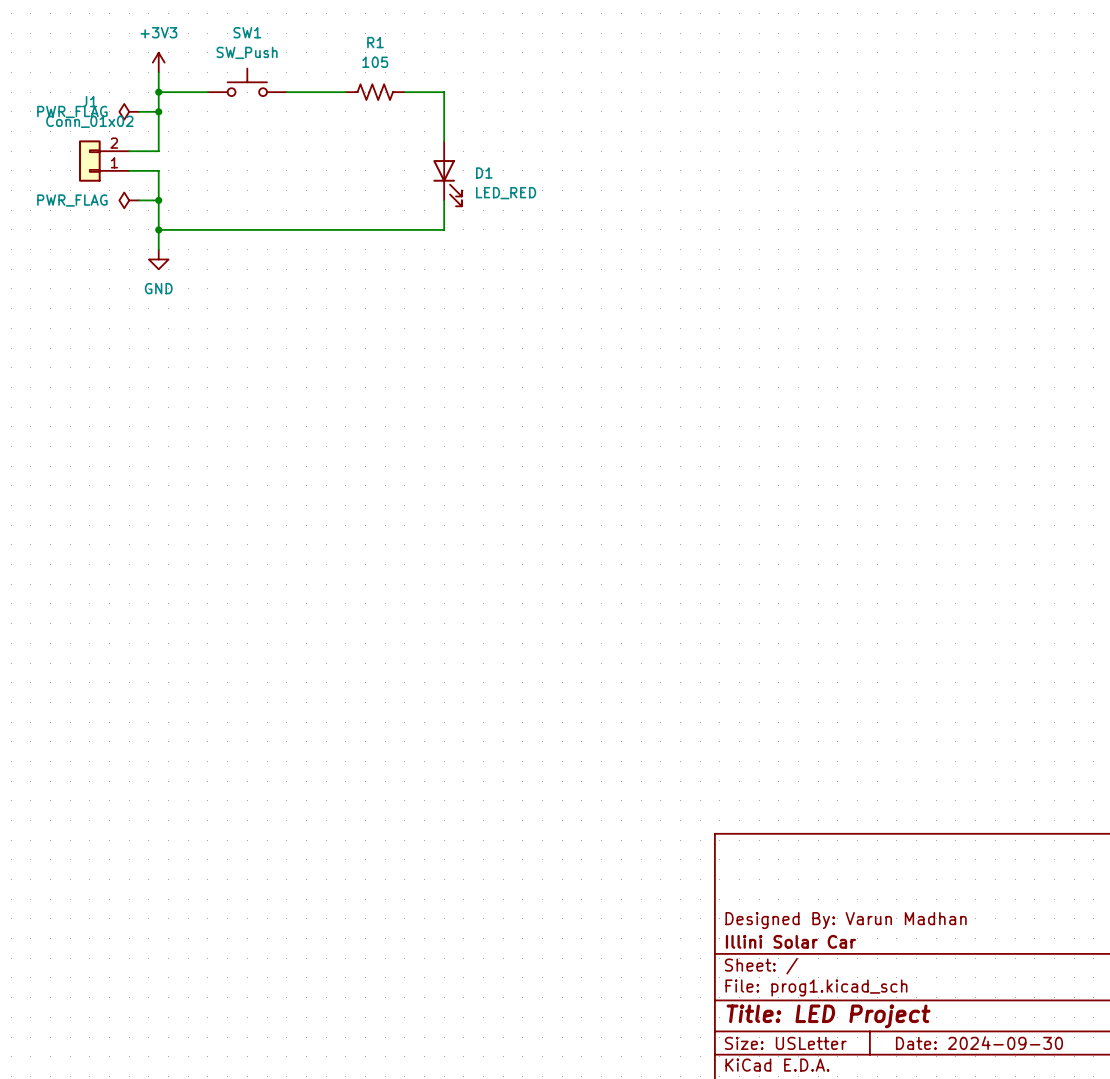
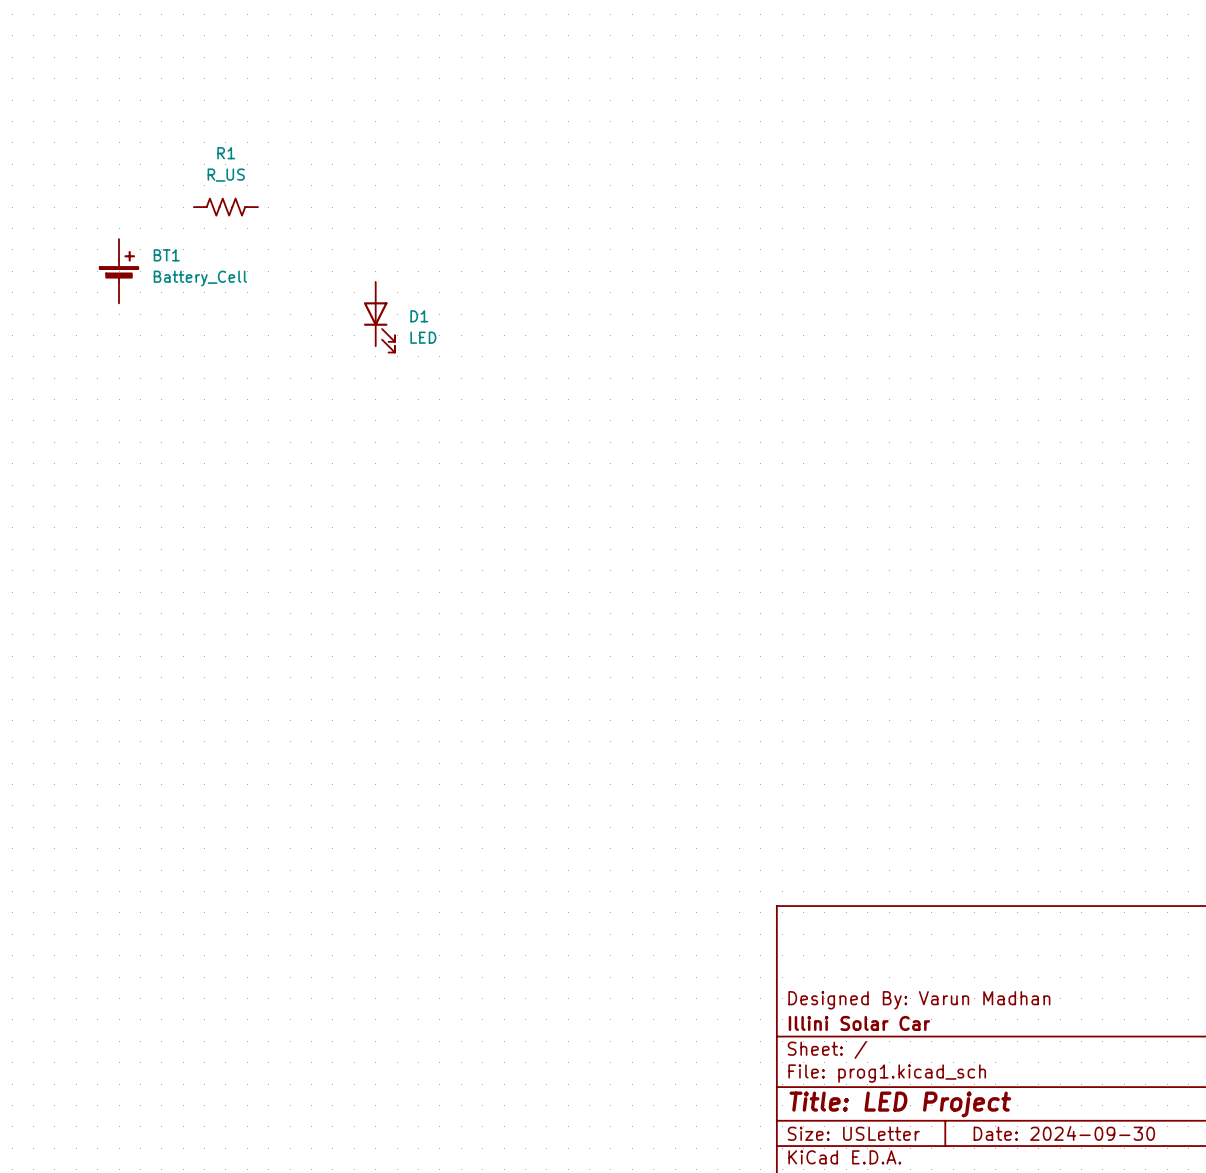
power symbol: +3V3 (158, 62) -> none
R1 value: 105 (375, 62) -> R_US (226, 175)
wire: (158, 72) (158, 151) (129, 151) -> none
SW1: SW_Push (247, 82) -> none
wire: (158, 92) (207, 92) -> none
junction: (158, 92) -> none
wire: (286, 92) (345, 92) -> none
R1 position: (375, 92) -> (225, 207)
wire: (404, 92) (444, 92) (444, 141) -> none
power symbol: PWR_FLAG (129, 111) -> none
wire: (139, 111) (158, 111) -> none
junction: (158, 111) -> none
J1: Conn_01x02 (104, 161) -> none
wire: (129, 170) (158, 170) (158, 249) -> none
D1 position: (447, 173) -> (379, 317)
D1 value: LED_RED (506, 193) -> LED (423, 337)
power symbol: PWR_FLAG (129, 200) -> none
wire: (139, 200) (158, 200) -> none
junction: (158, 200) -> none
wire: (444, 200) (444, 229) (158, 229) -> none
junction: (158, 229) -> none
BT1: none -> Battery_Cell (119, 271)
power symbol: GND (158, 259) -> none

